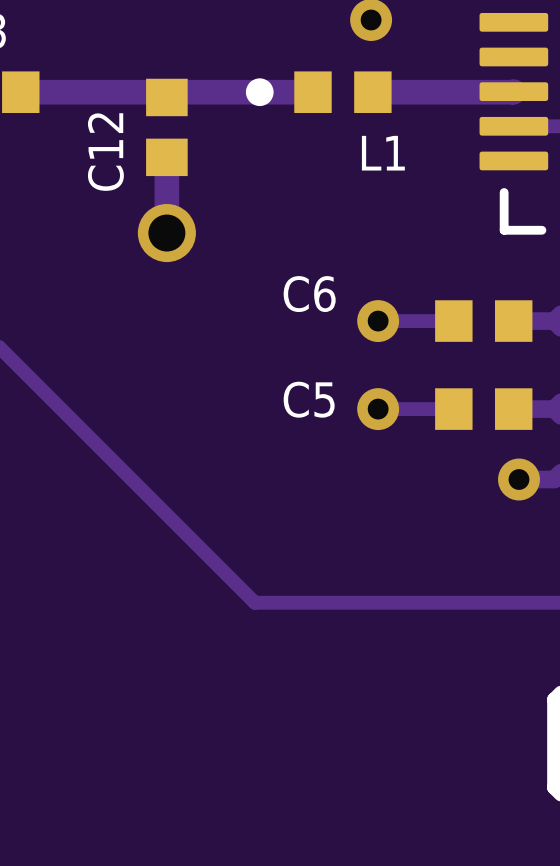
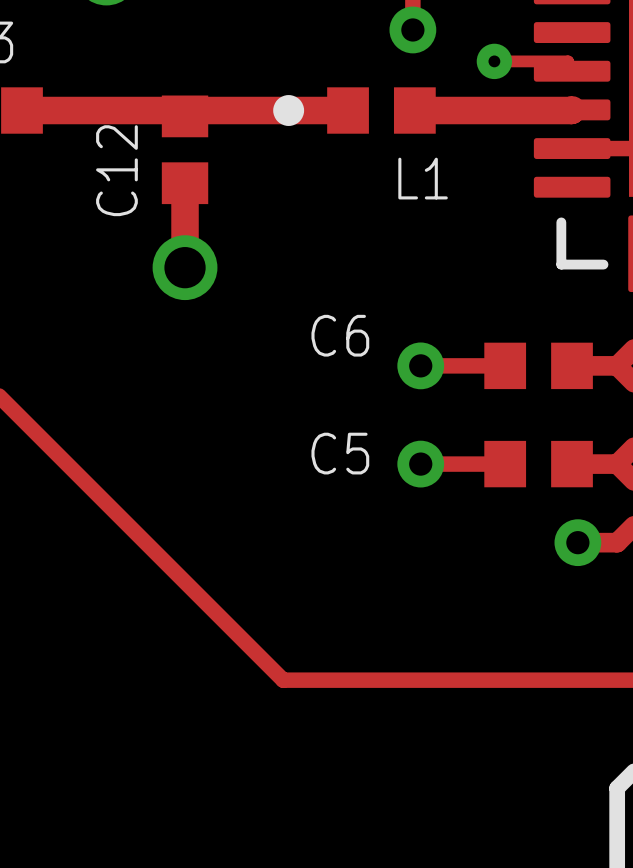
track: none -> (494, 61) (568, 61) (572, 71)
via: none -> (494, 61)

